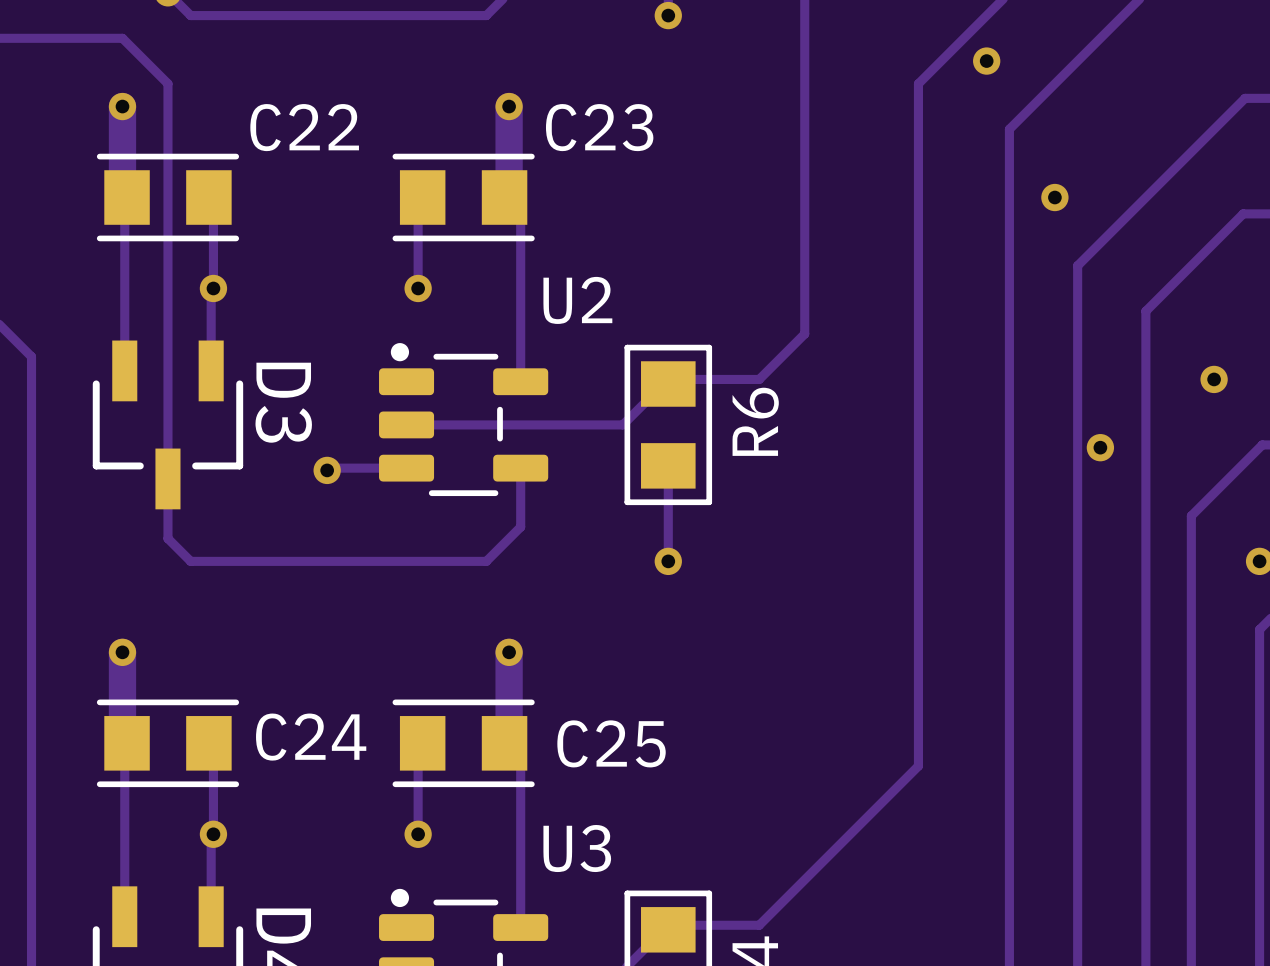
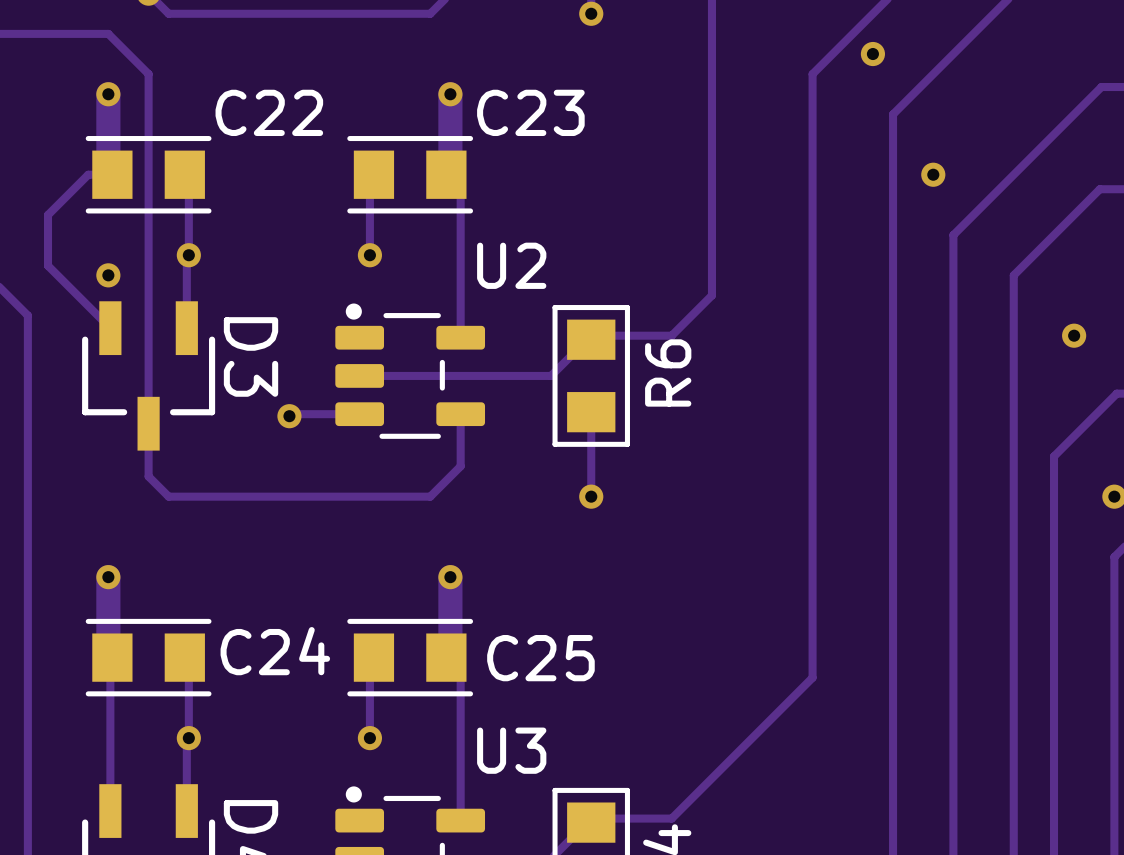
track: (124, 199) (124, 370) -> (108, 174) (88, 174) (48, 214) (48, 265) (110, 328)
via: none -> (108, 275)
via: (1100, 447) -> none

